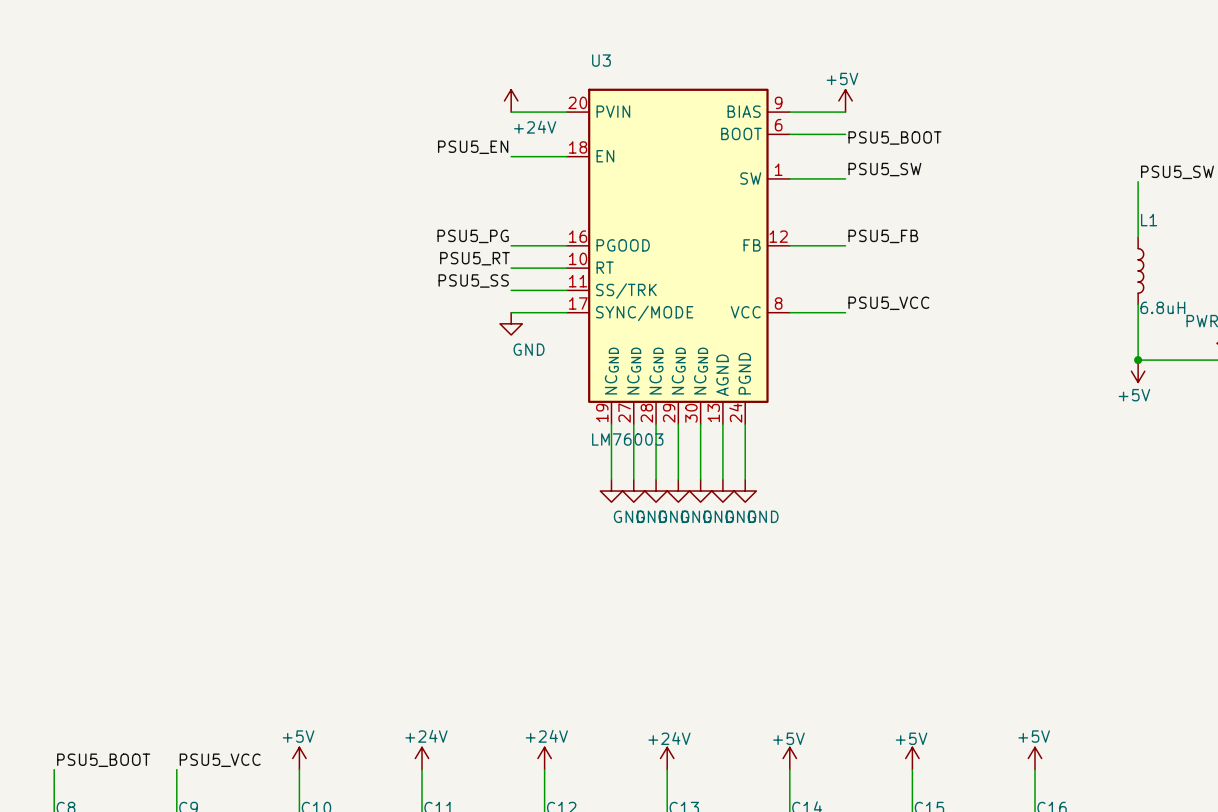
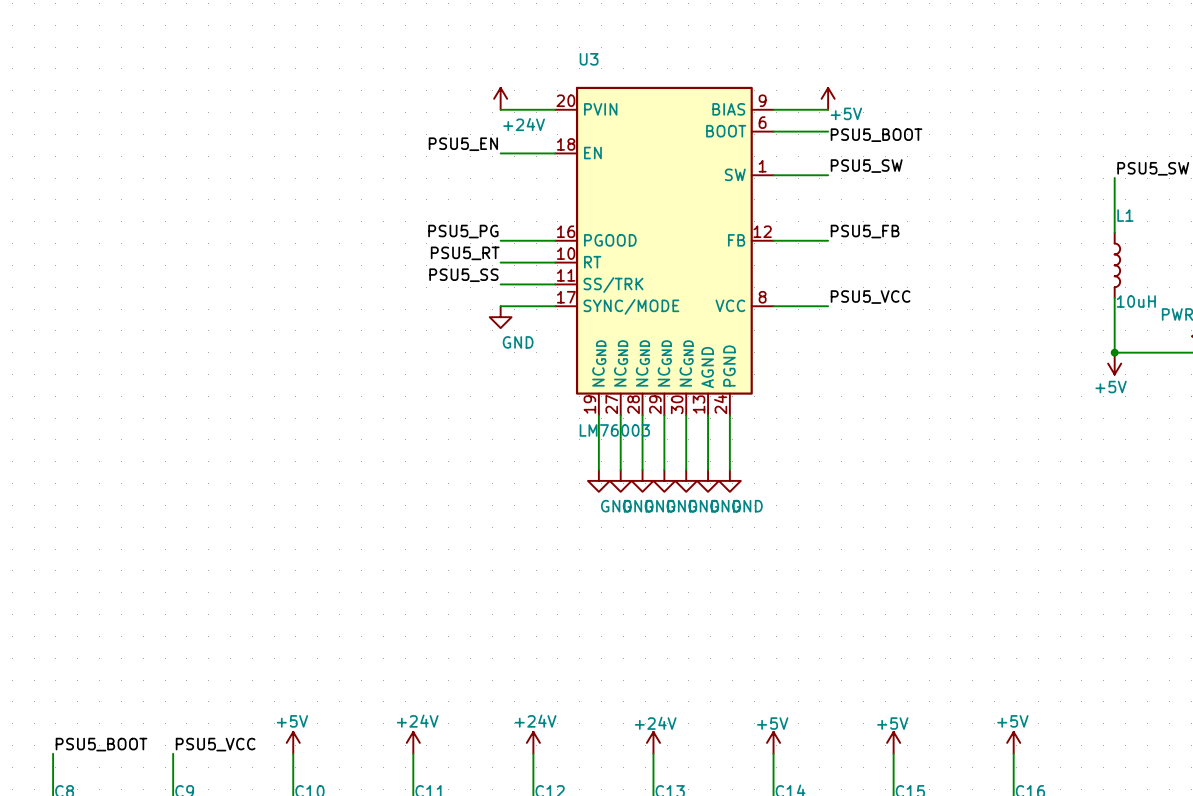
power symbol text position: +5V (842, 78) -> +5V (846, 113)
L1 value: 6.8uH (1162, 307) -> 10uH (1136, 301)

